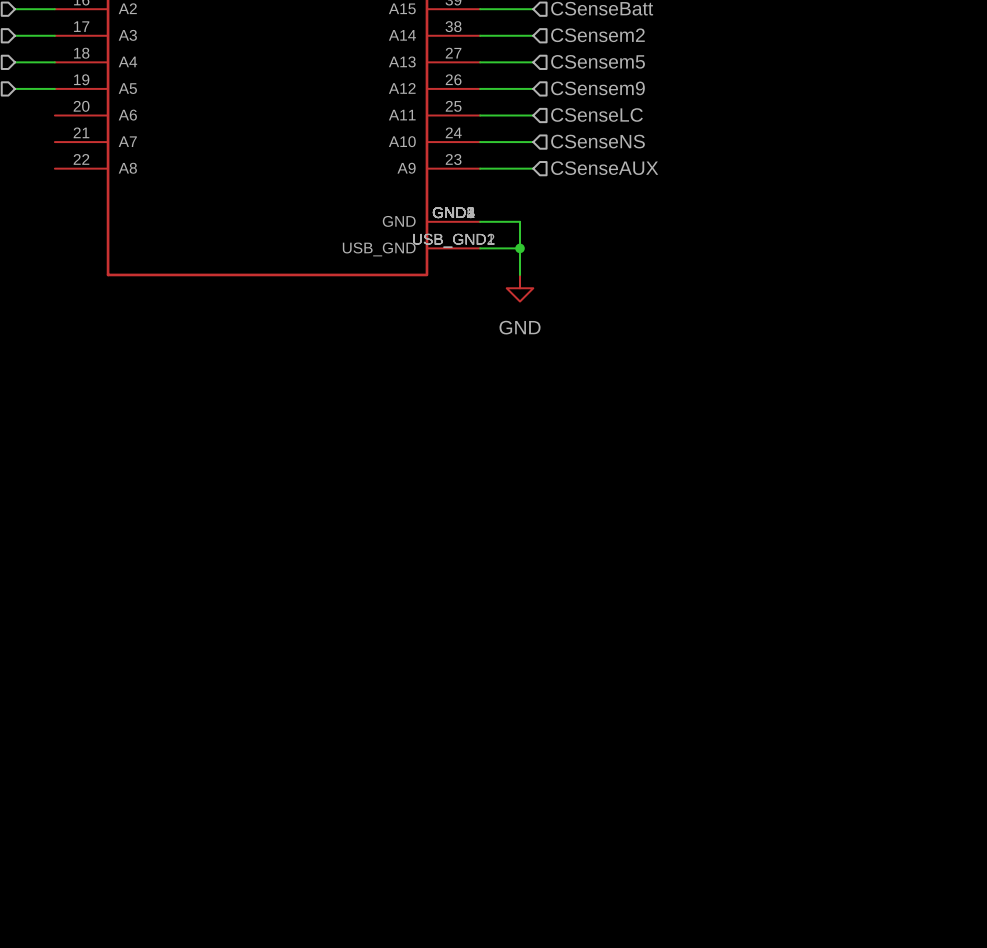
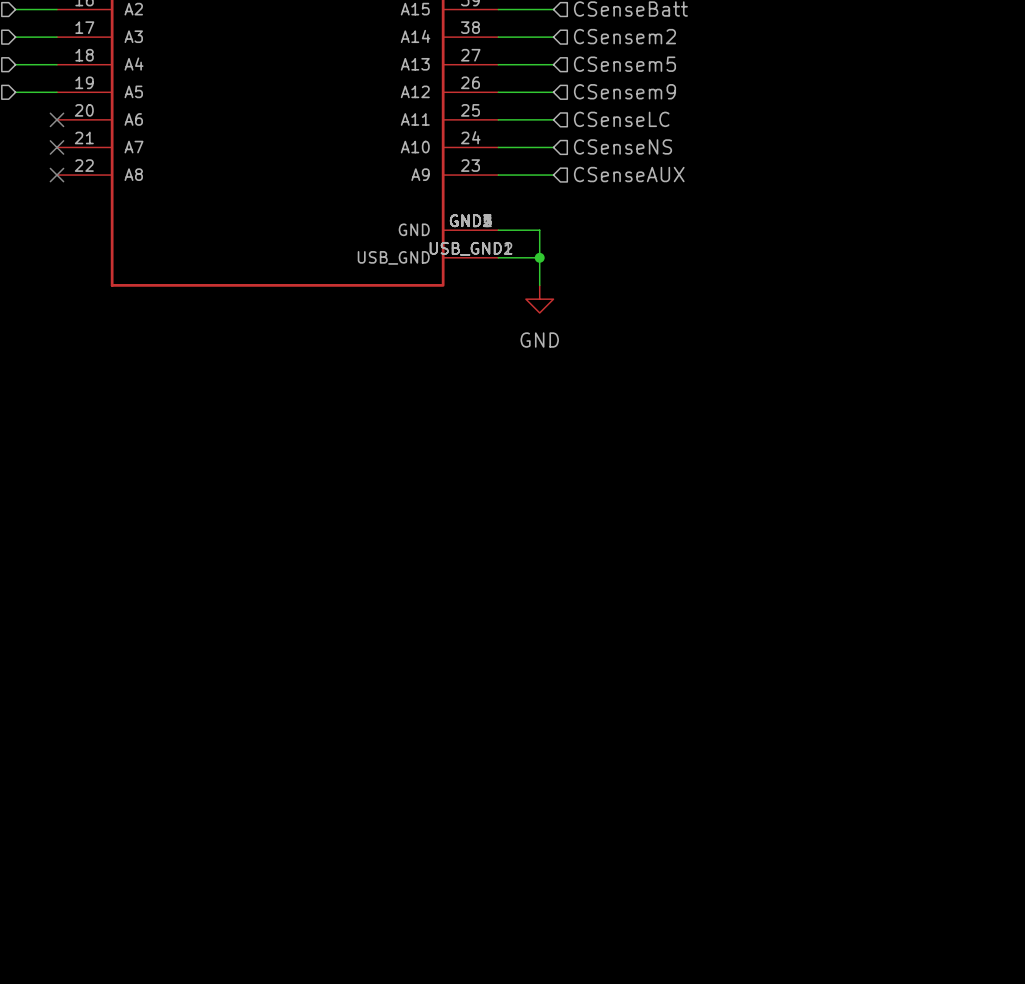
no-connect mark: none -> (56, 119)
no-connect mark: none -> (56, 147)
no-connect mark: none -> (56, 175)

